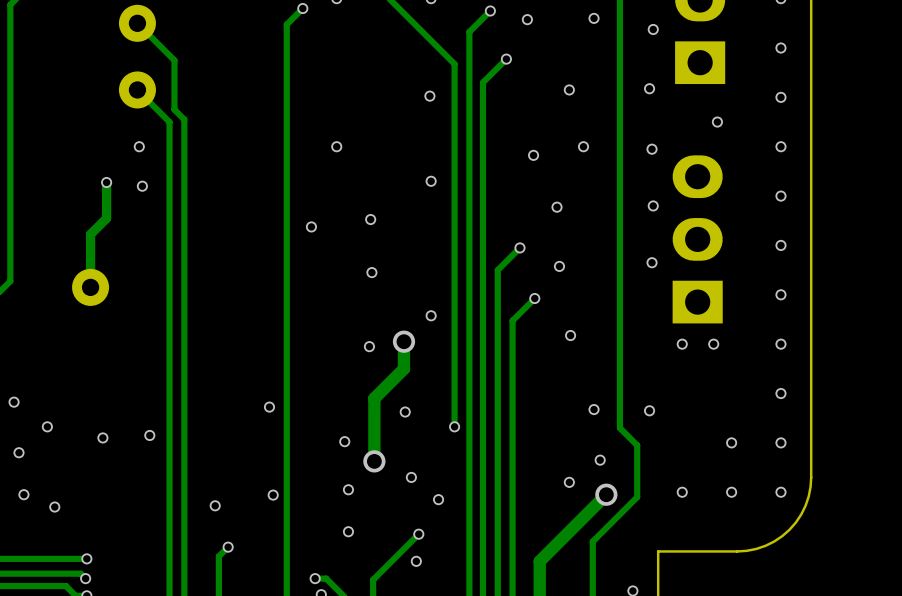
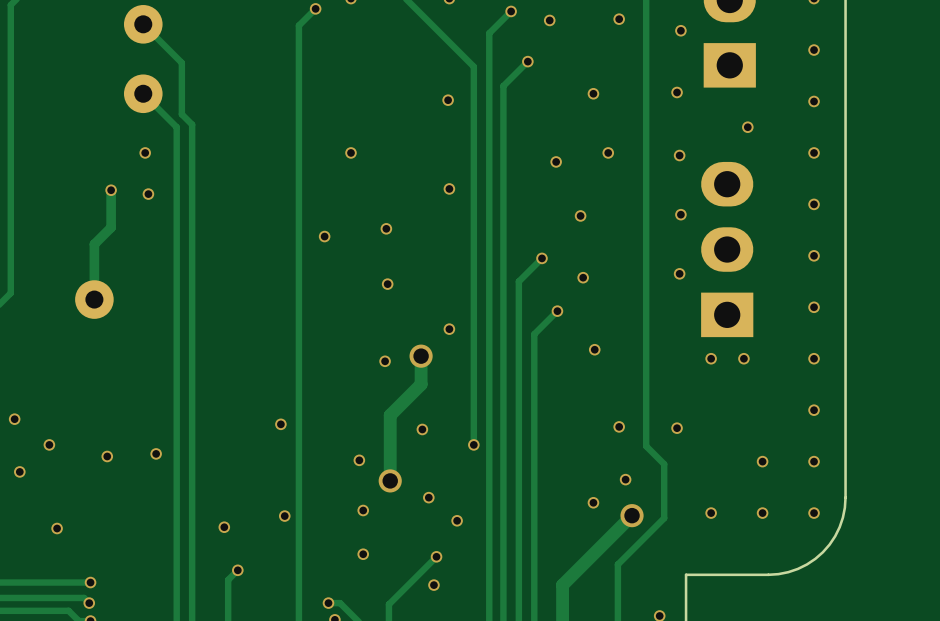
via: (23, 494) -> none

